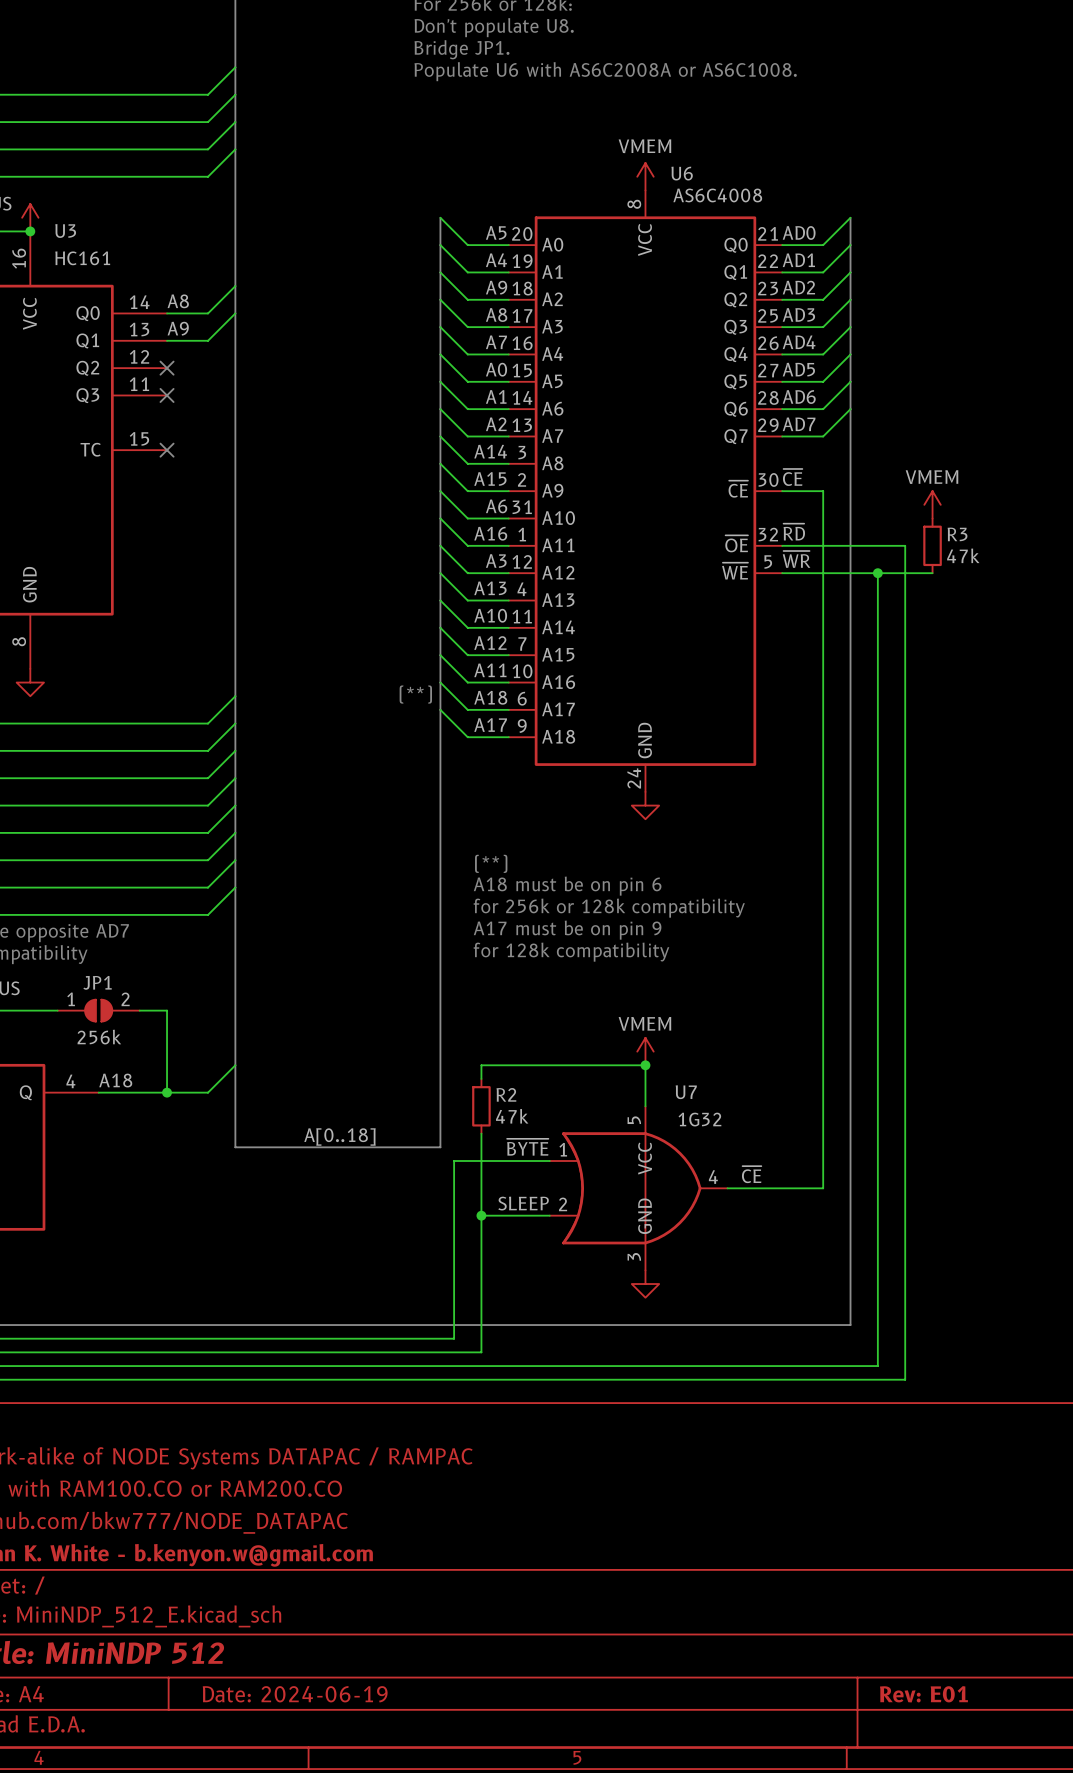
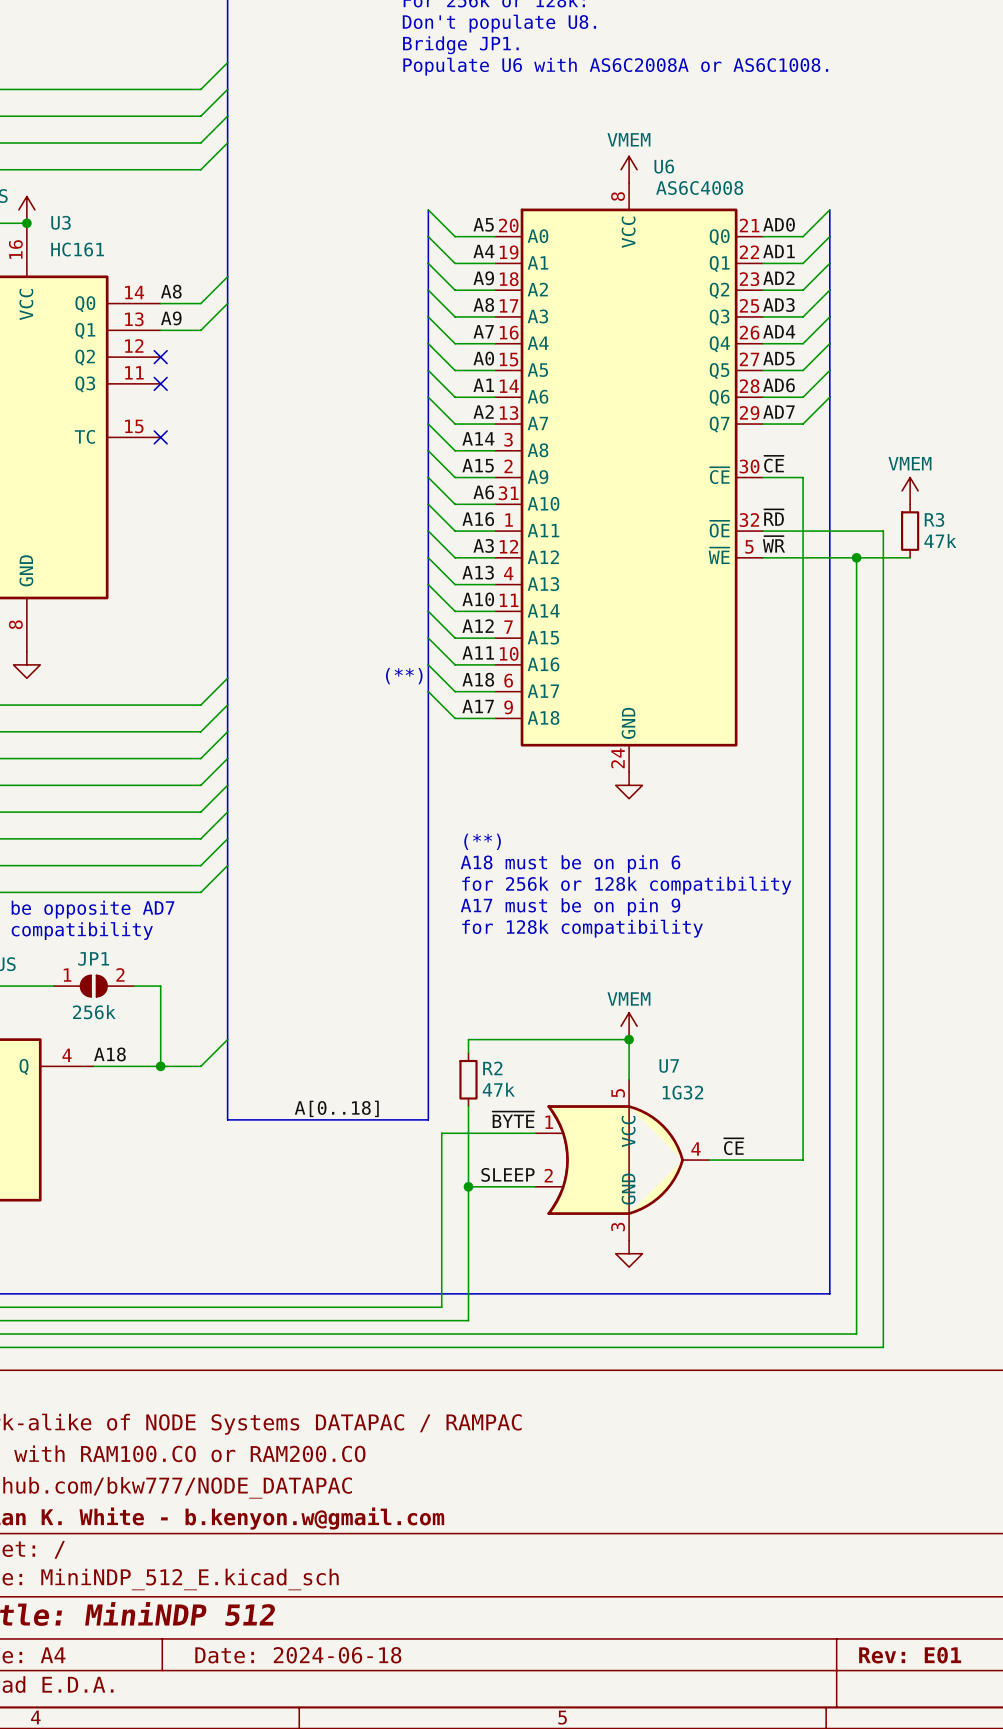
title block: Date: 2024-06-19 (295, 1694) -> Date: 2024-06-18 (298, 1655)

